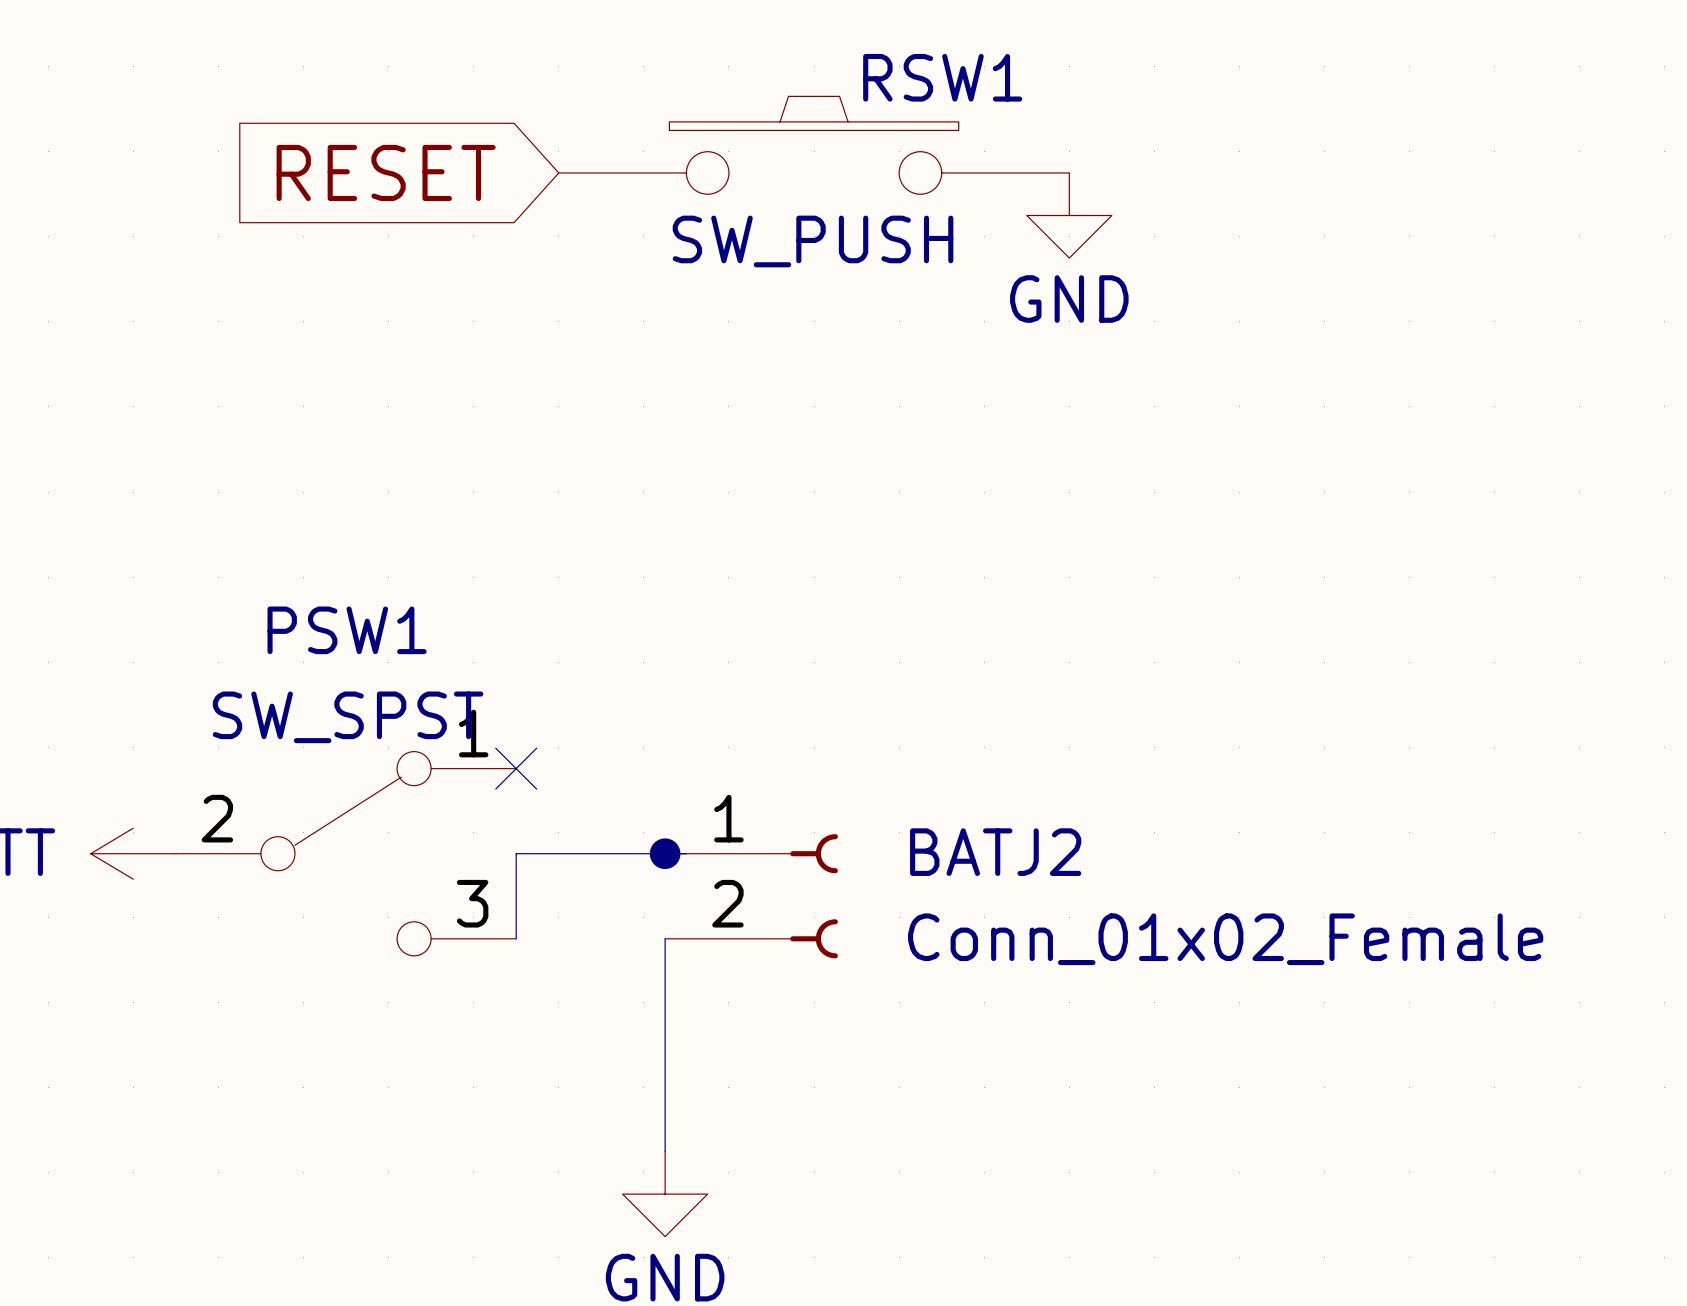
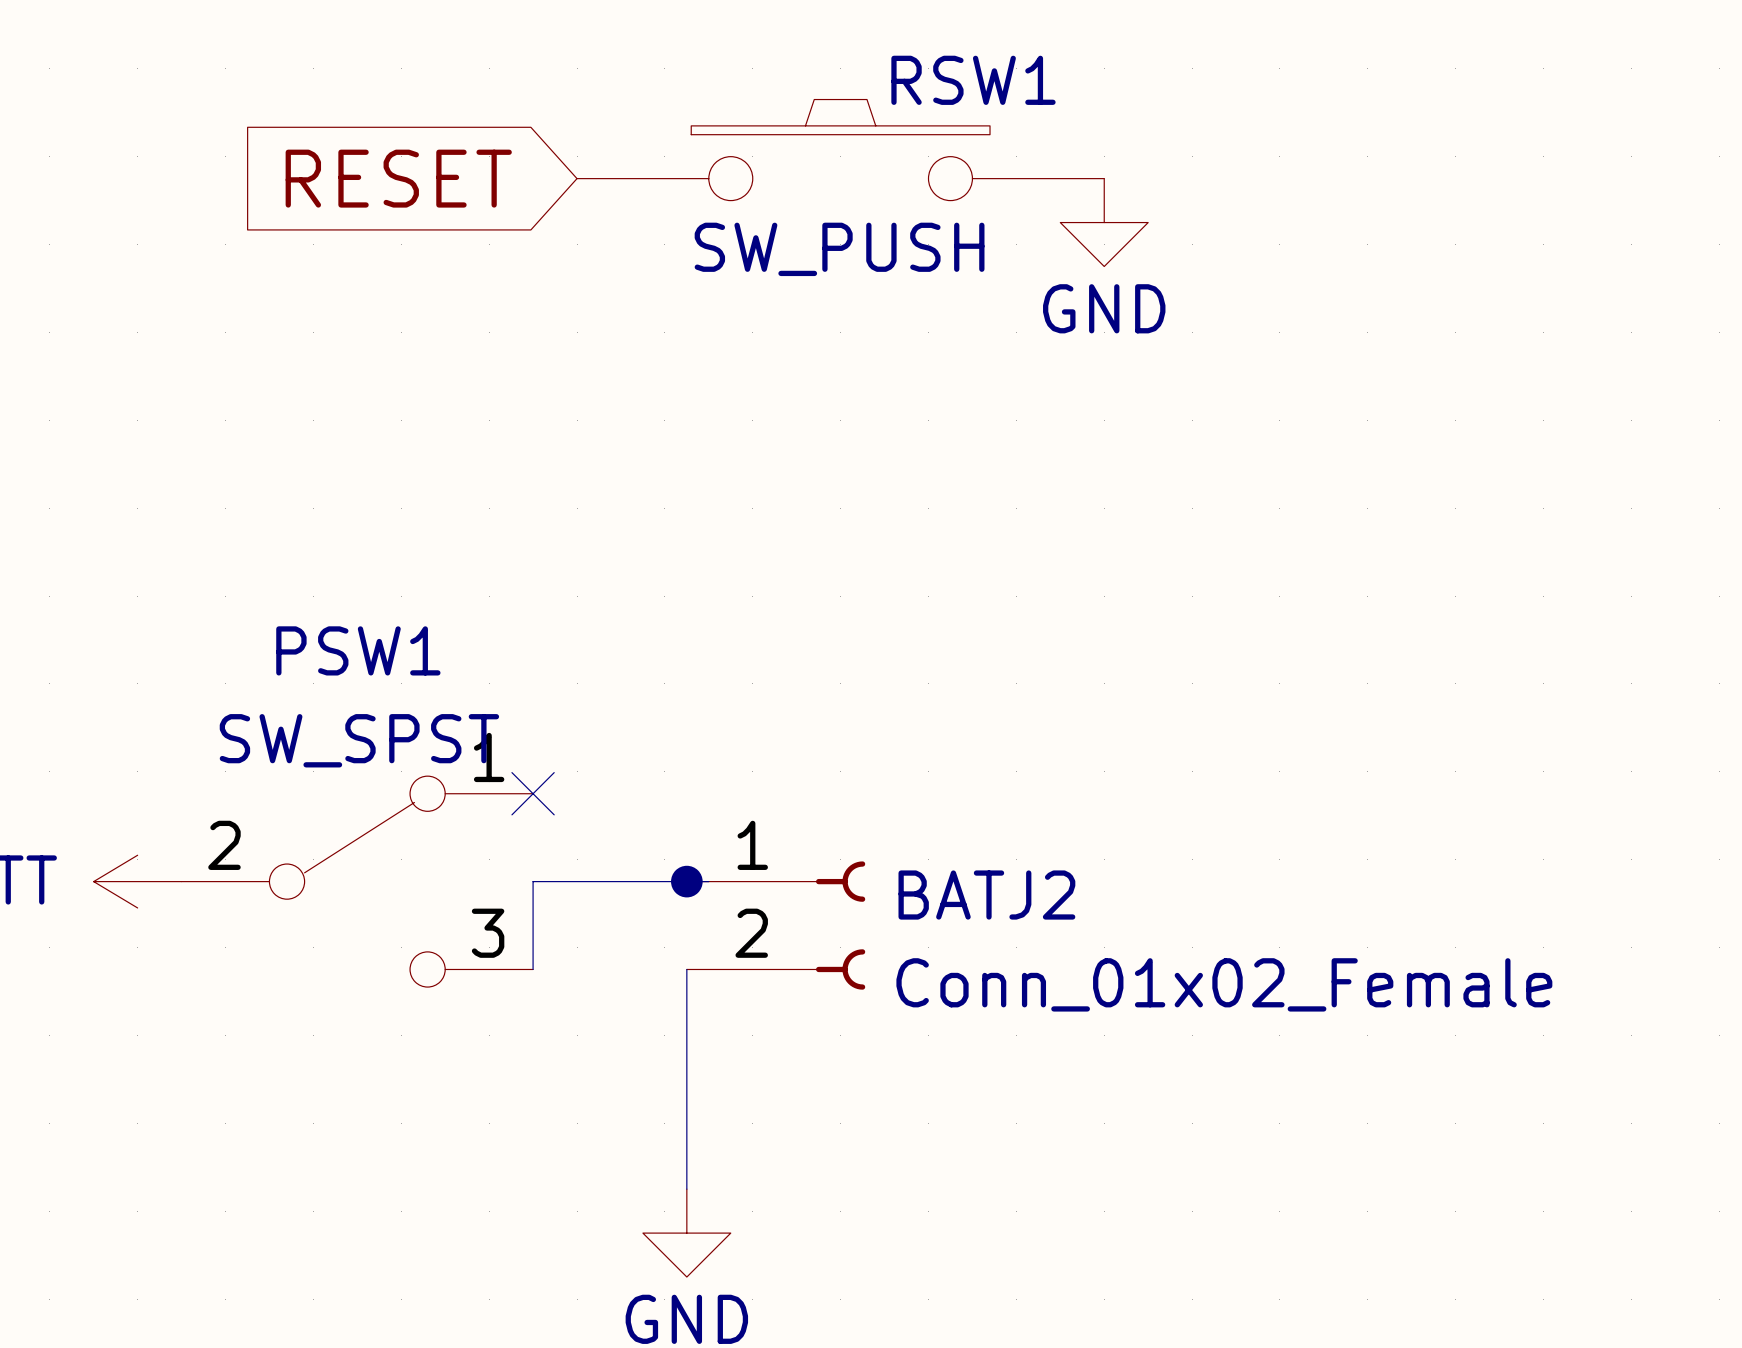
BATJ2 name position: BATJ2 (995, 852) -> BATJ2 (986, 895)
BATJ2 value position: Conn_01x02_Female (1225, 939) -> Conn_01x02_Female (1224, 984)

